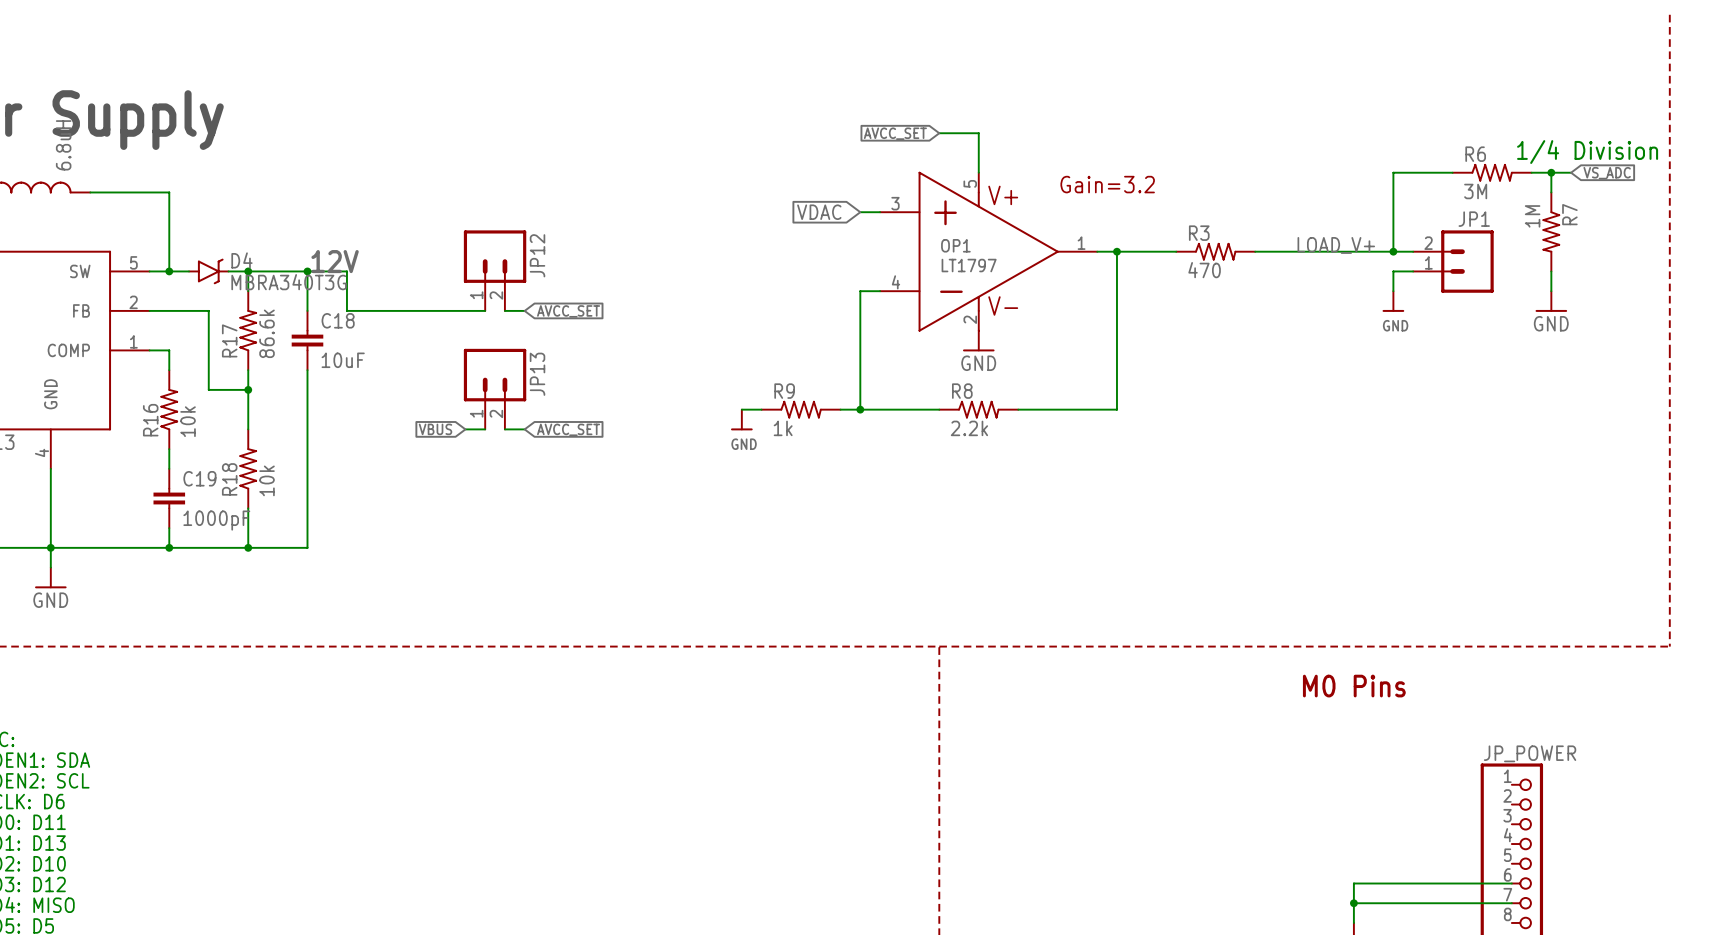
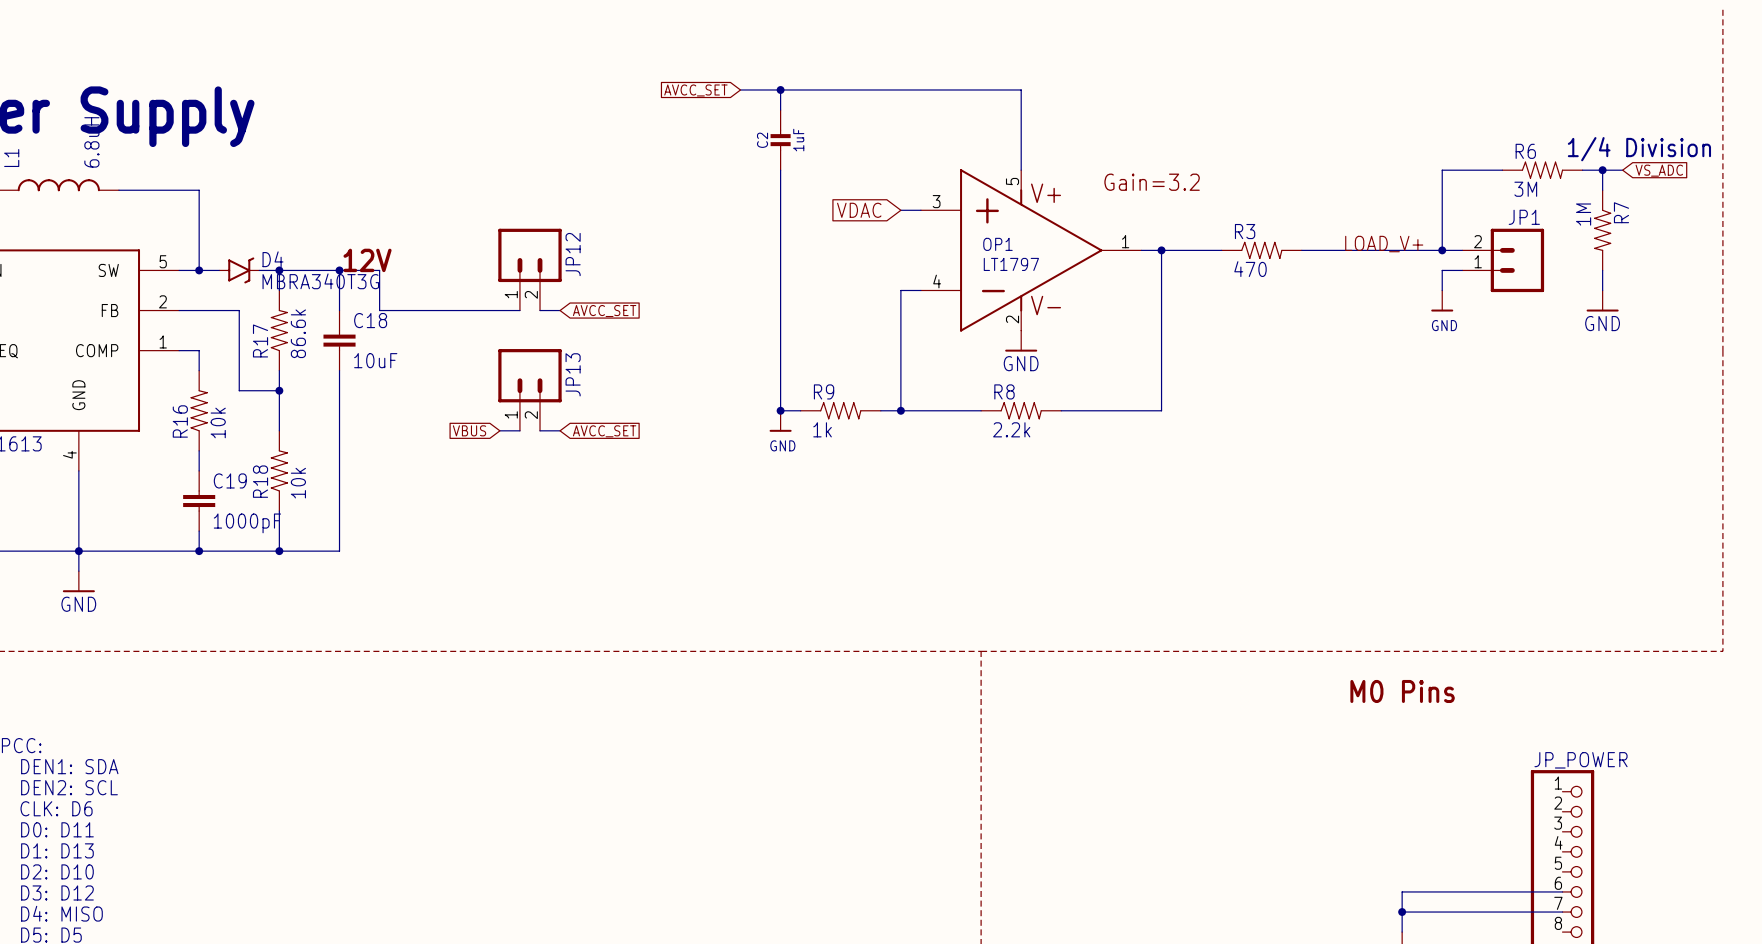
wire: none -> (780, 89) (780, 110)
junction: none -> (780, 89)
global label: none -> AVCC_SET (695, 90)
global label: AVCC_SET (895, 133) -> none
wire: (939, 133) (978, 133) -> (740, 89) (1021, 89) (1021, 130)
C2: none -> 1uF (780, 140)
wire: none -> (780, 170) (780, 410)
junction: none -> (780, 410)

